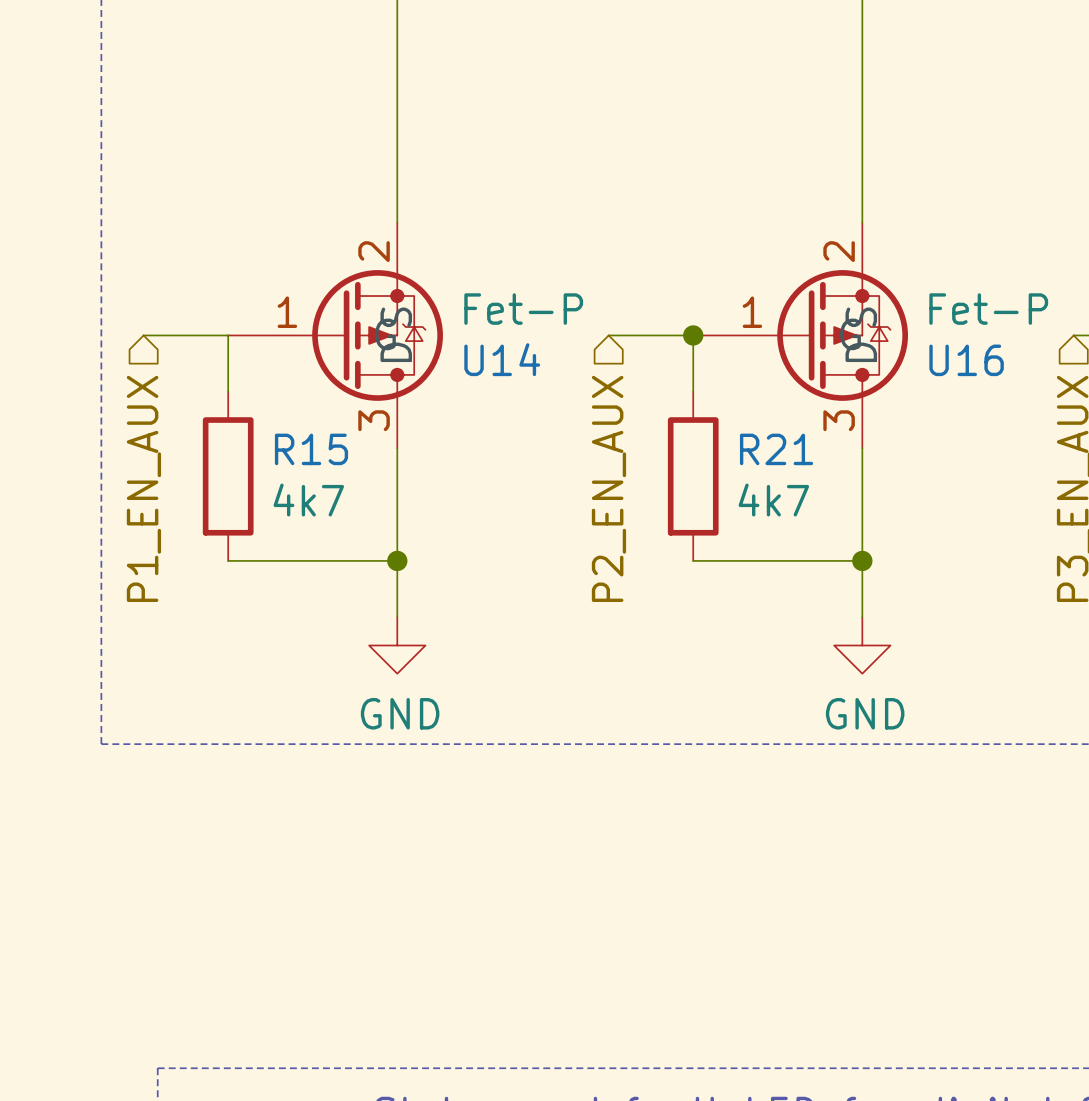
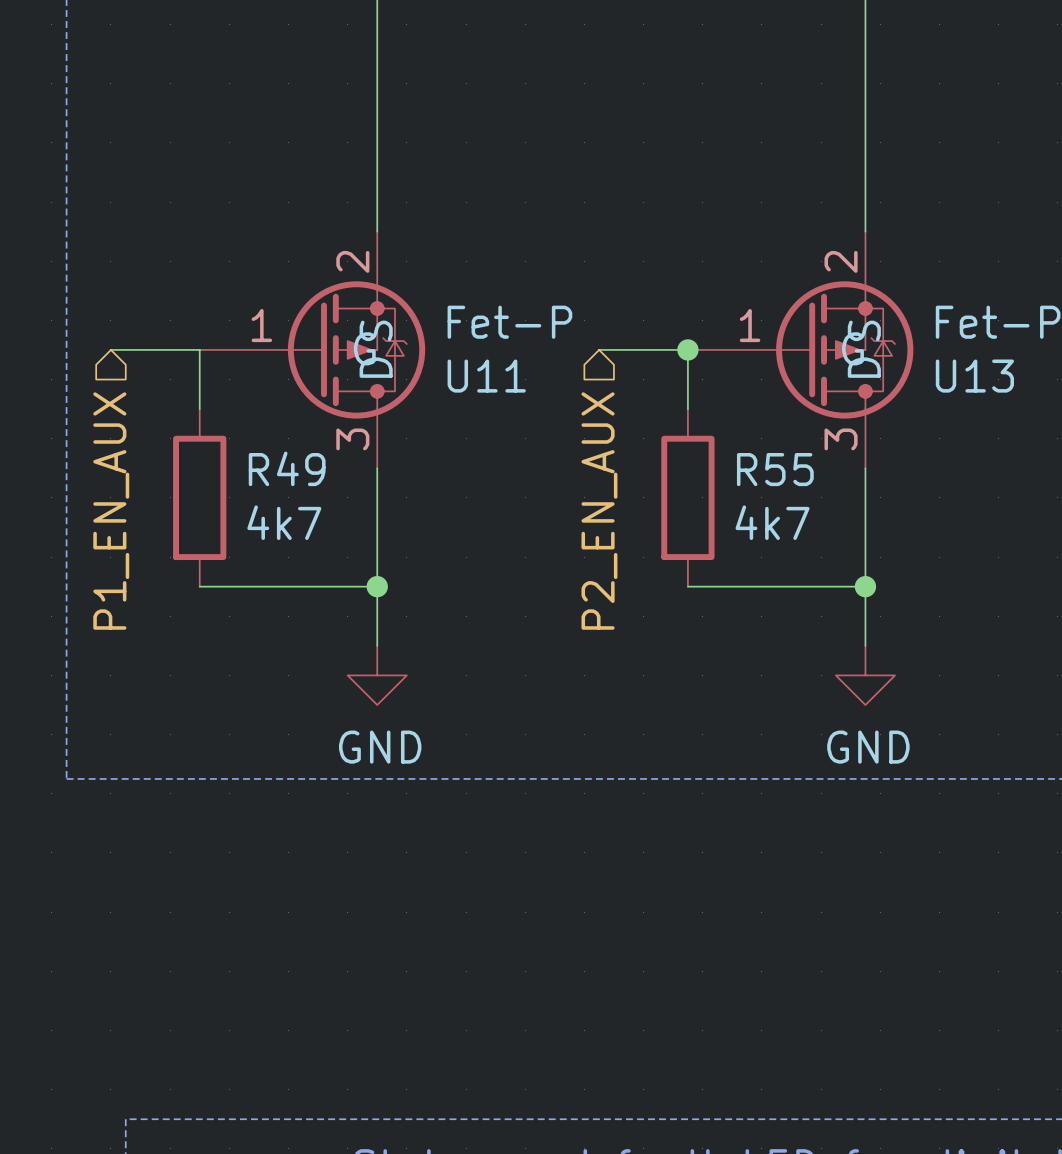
U14 name: U14 (502, 359) -> U11 (486, 376)
U16 name: U16 (966, 360) -> U13 (974, 376)
R15 name: R15 (311, 449) -> R49 (287, 468)
R21 name: R21 (776, 449) -> R55 (775, 469)

